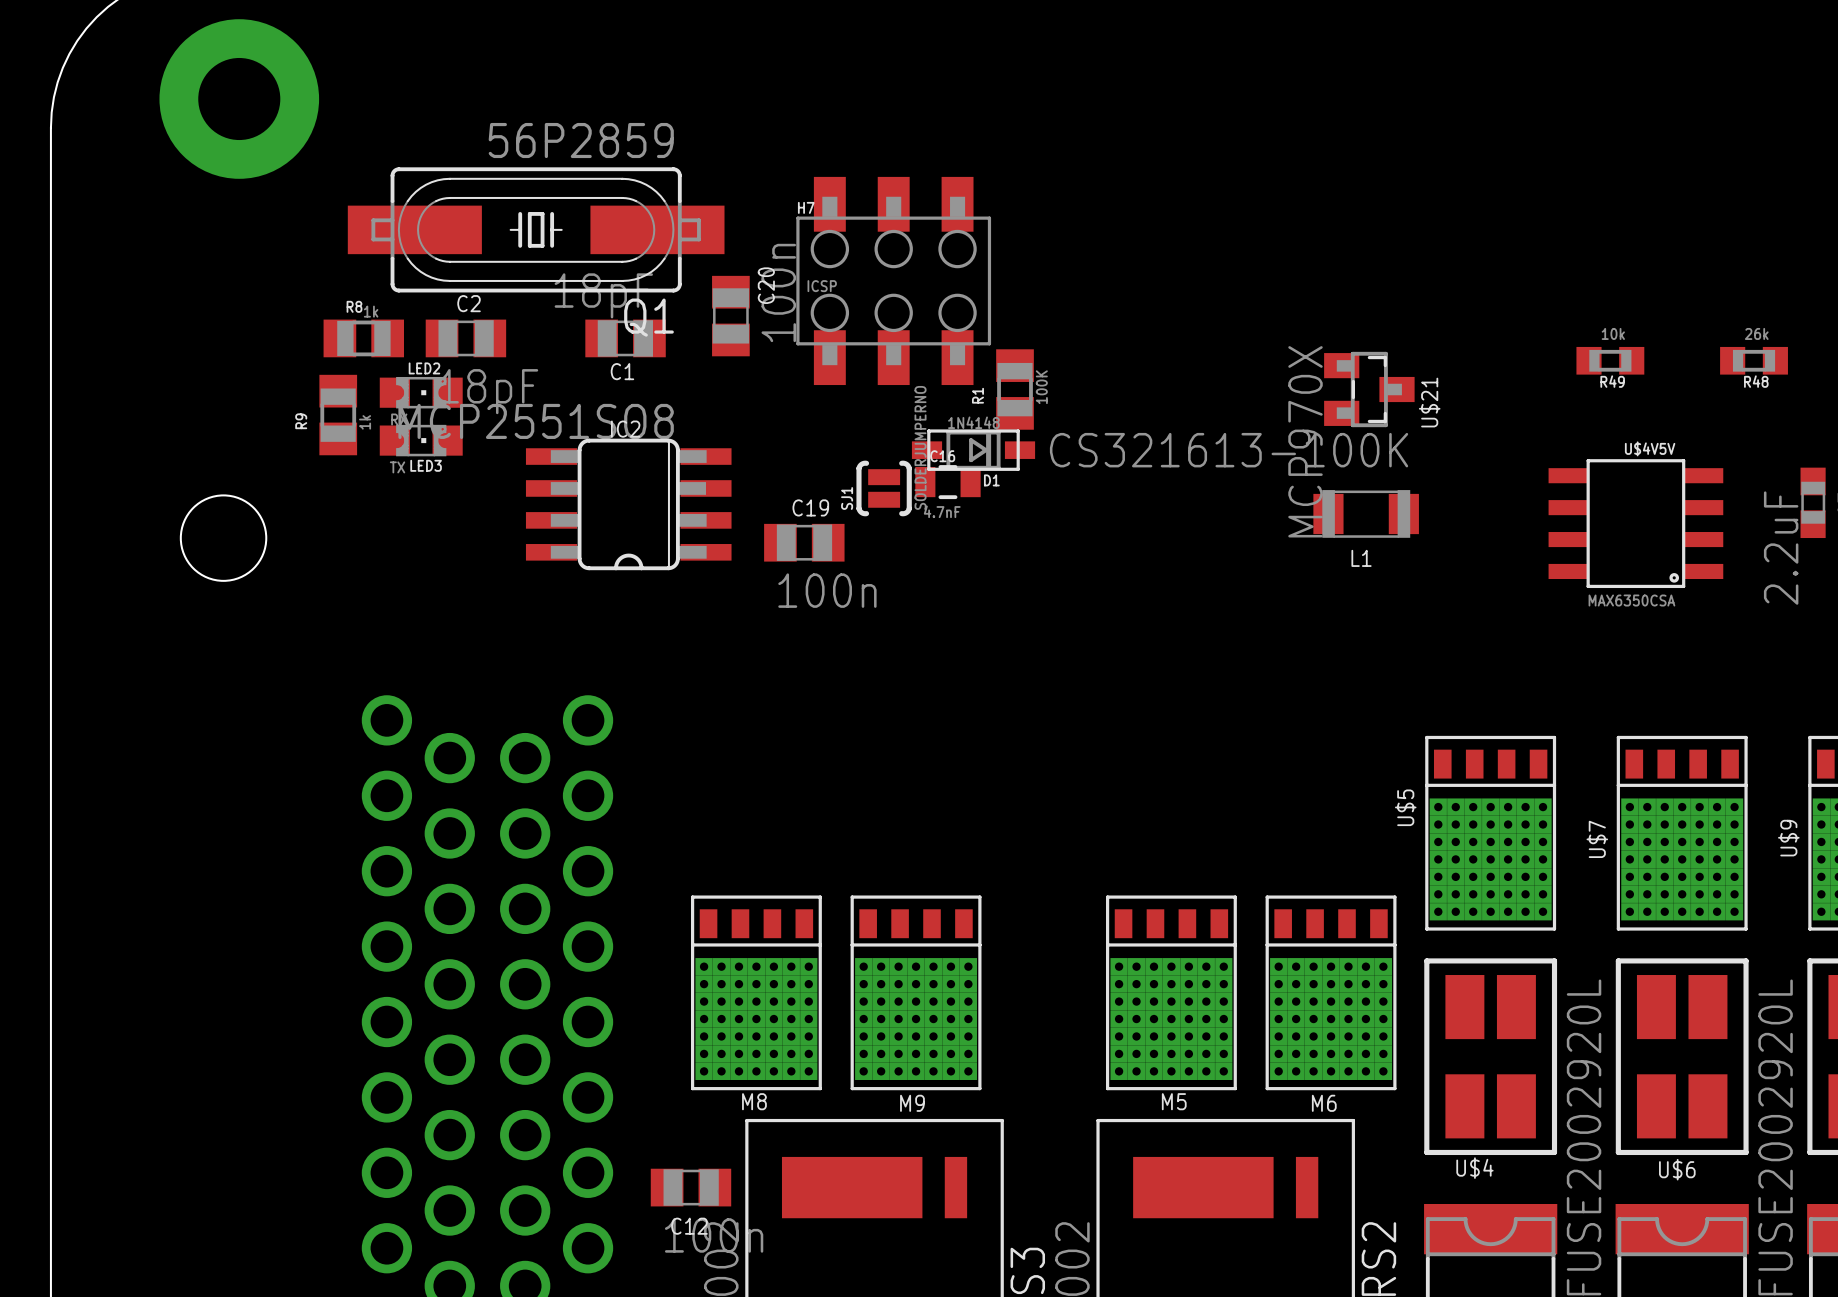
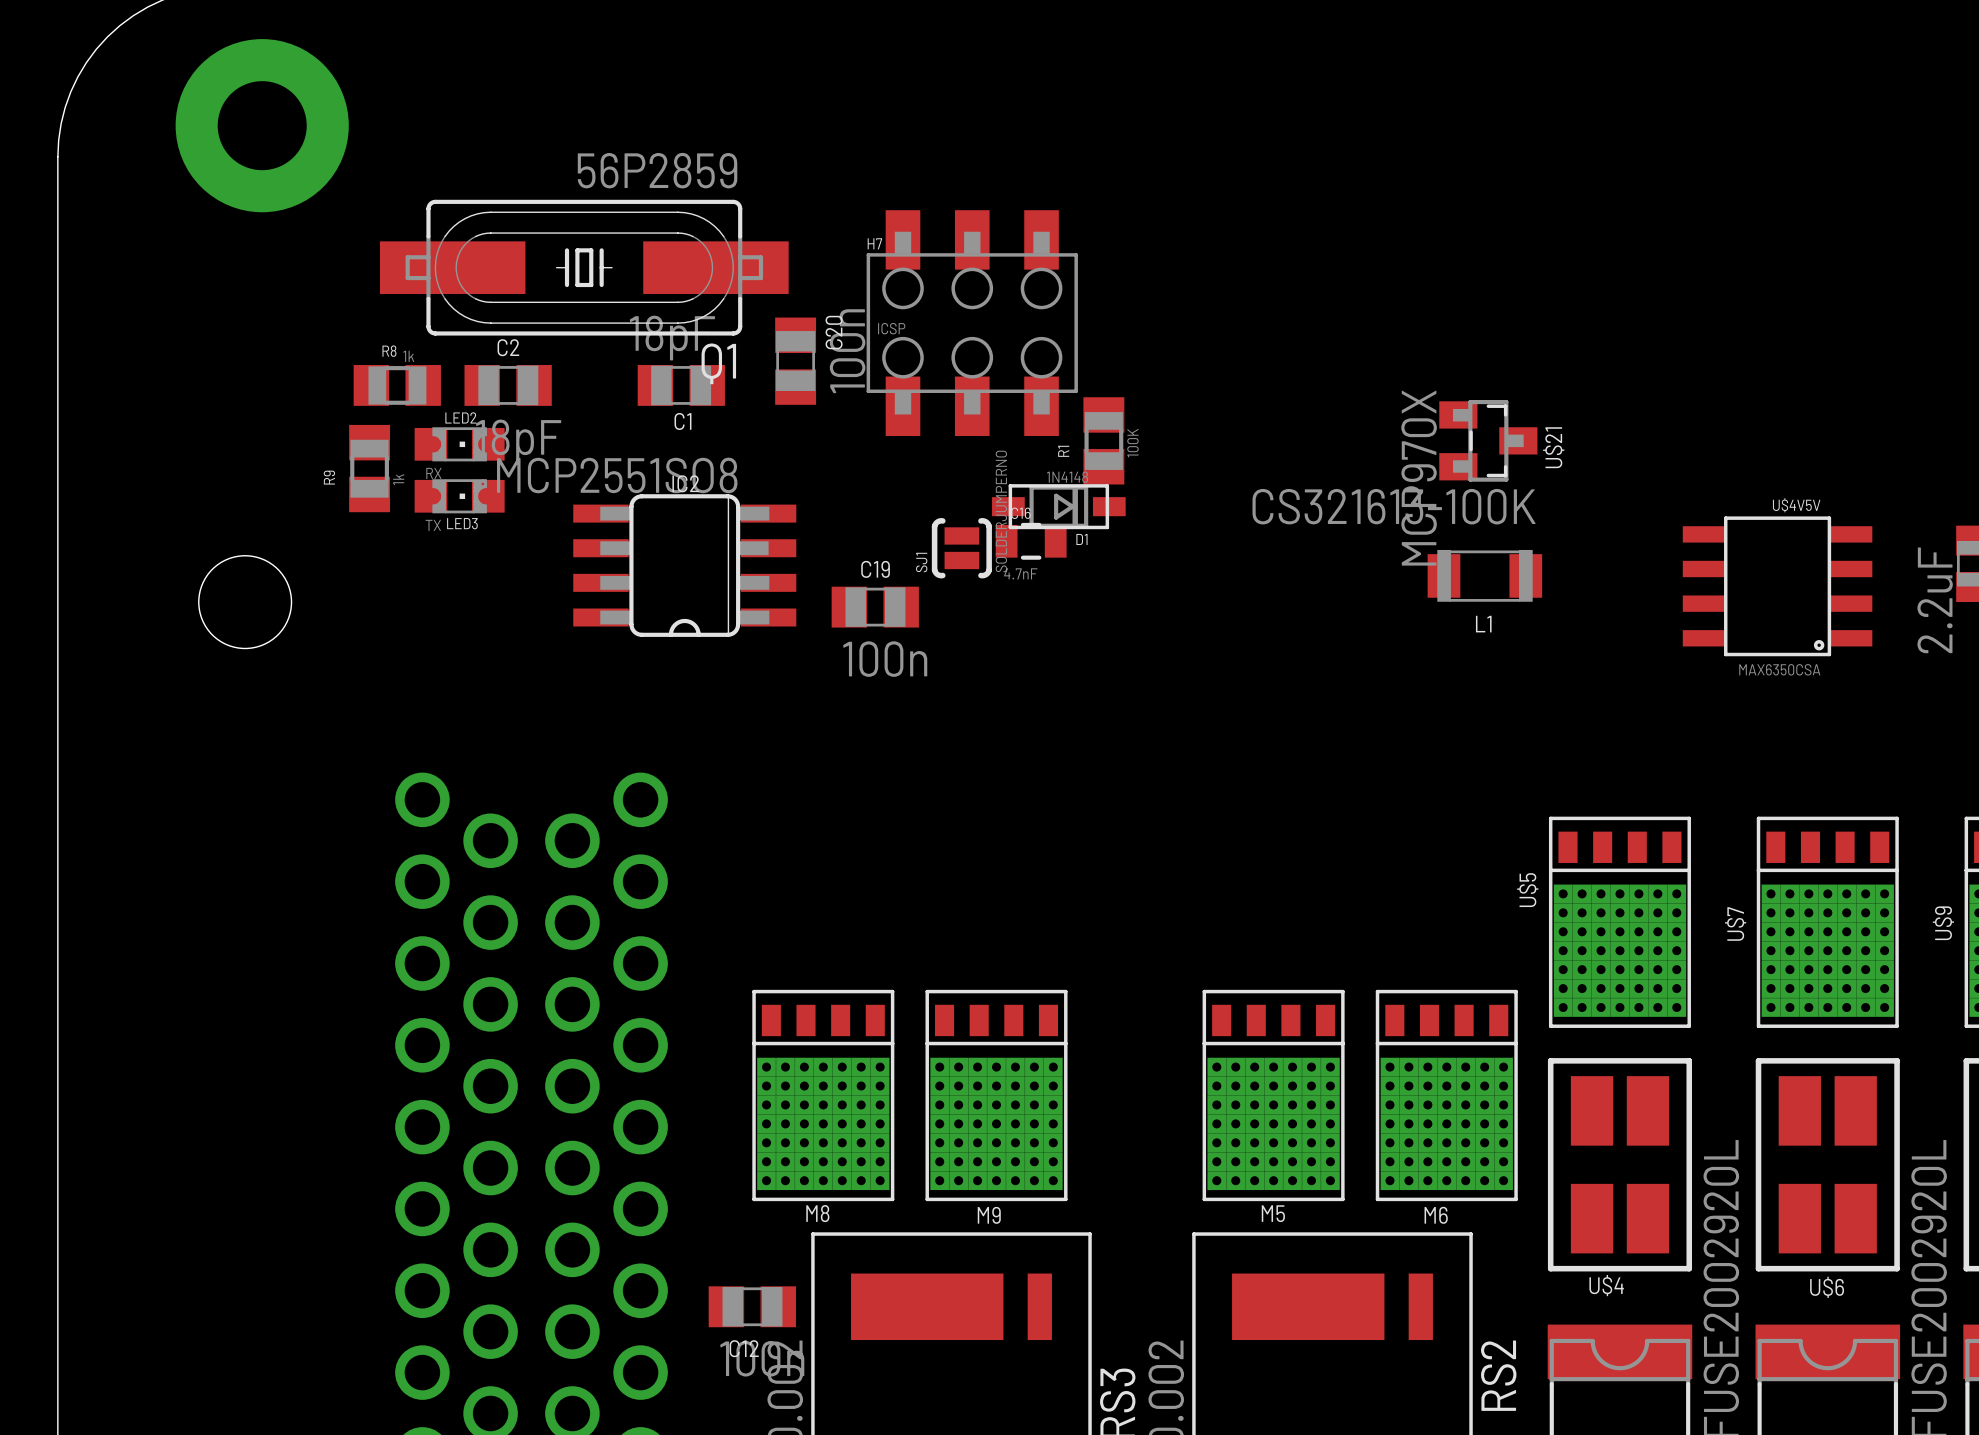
R49: 10k (1610, 360) -> none
R48: 26k (1754, 360) -> none

